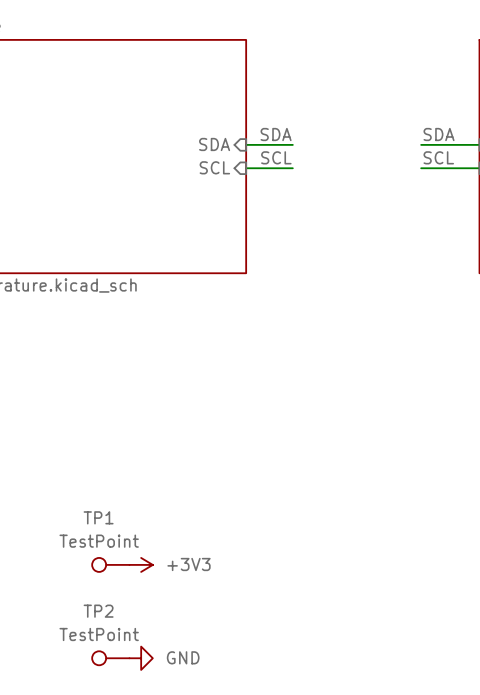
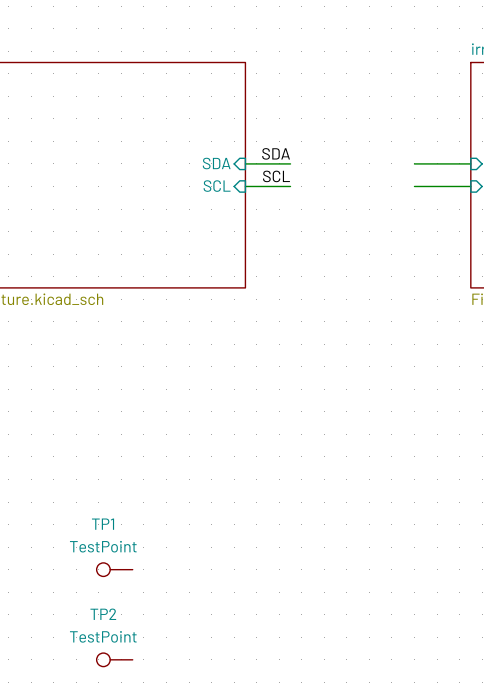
label: SDA (439, 134) -> none
label: SCL (438, 157) -> none
power symbol: +3V3 (141, 564) -> none
power symbol: GND (141, 658) -> none

